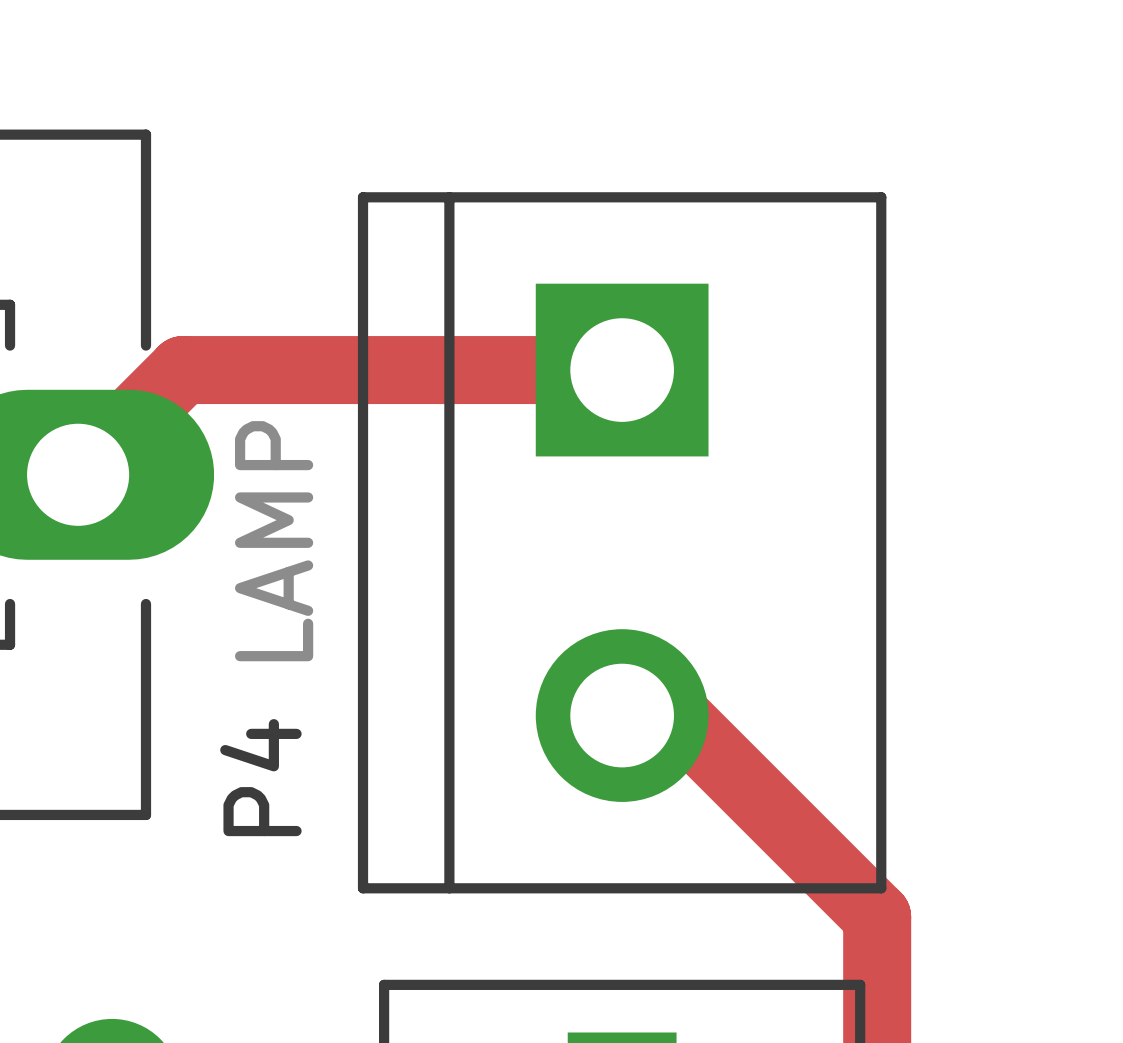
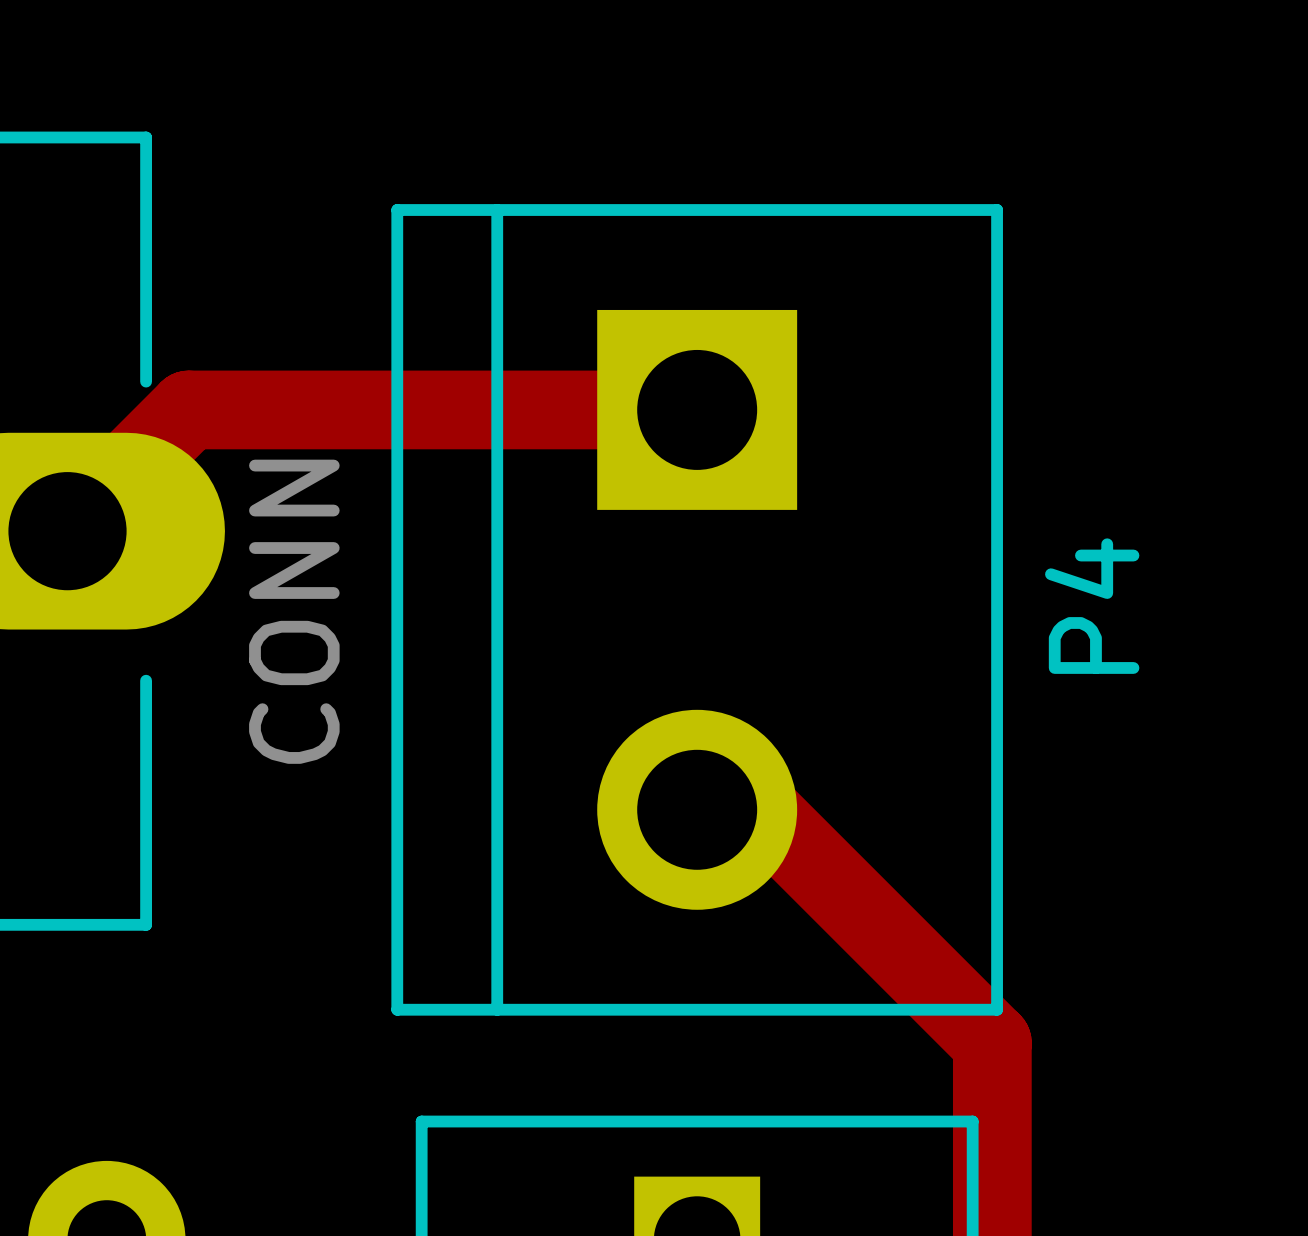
P4 value: LAMP (274, 541) -> CONN (294, 611)
P4 name position: P4 (260, 777) -> P4 (1092, 606)

